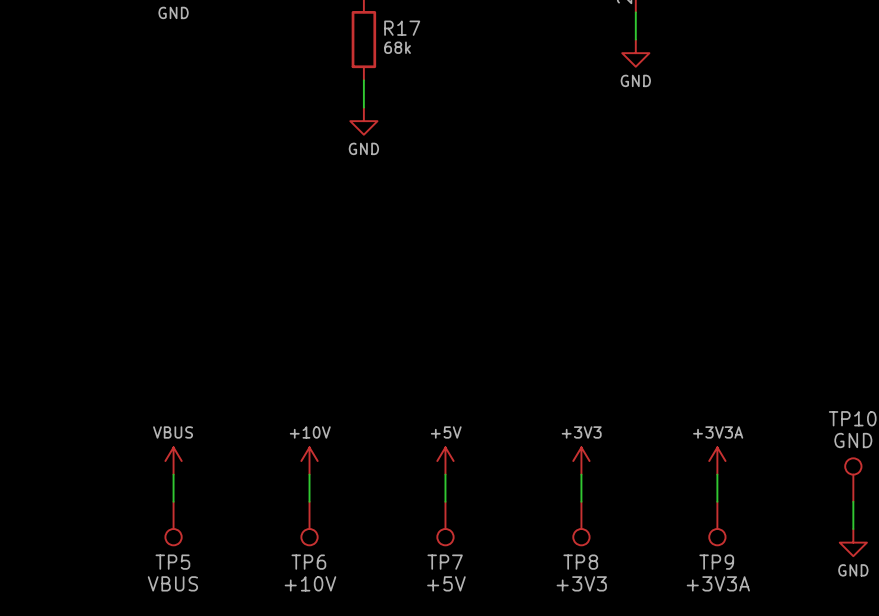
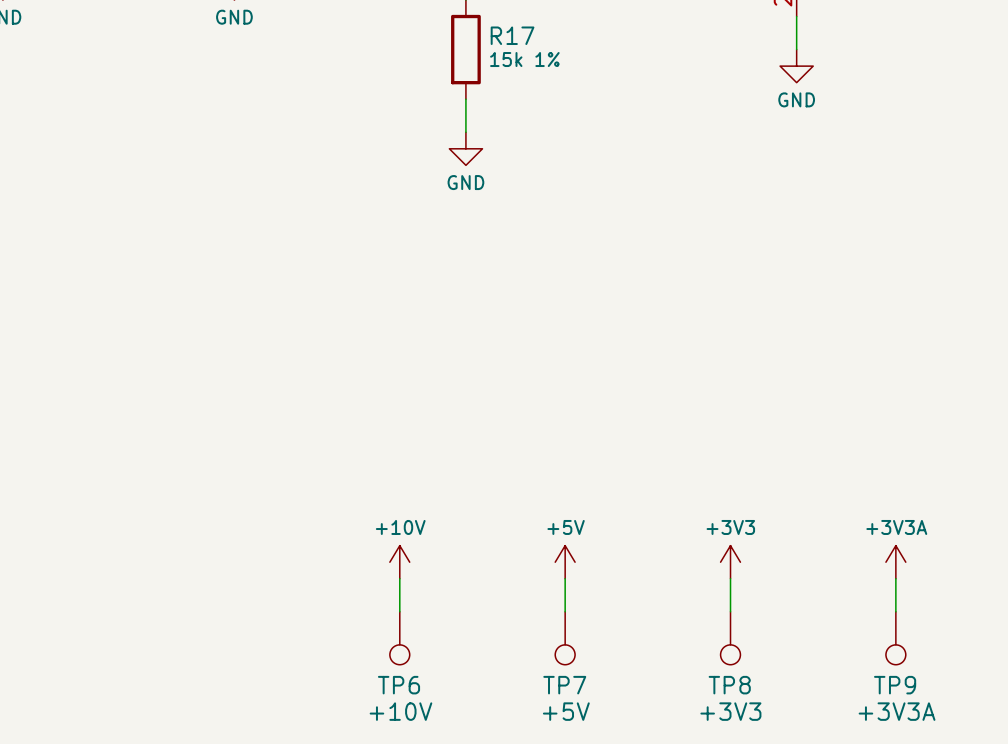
R17 value: 68k (397, 47) -> 15k 1% (524, 59)
power symbol: VBUS (173, 461) -> none
wire: (173, 474) (173, 501) -> none
TP5: VBUS (173, 523) -> none

